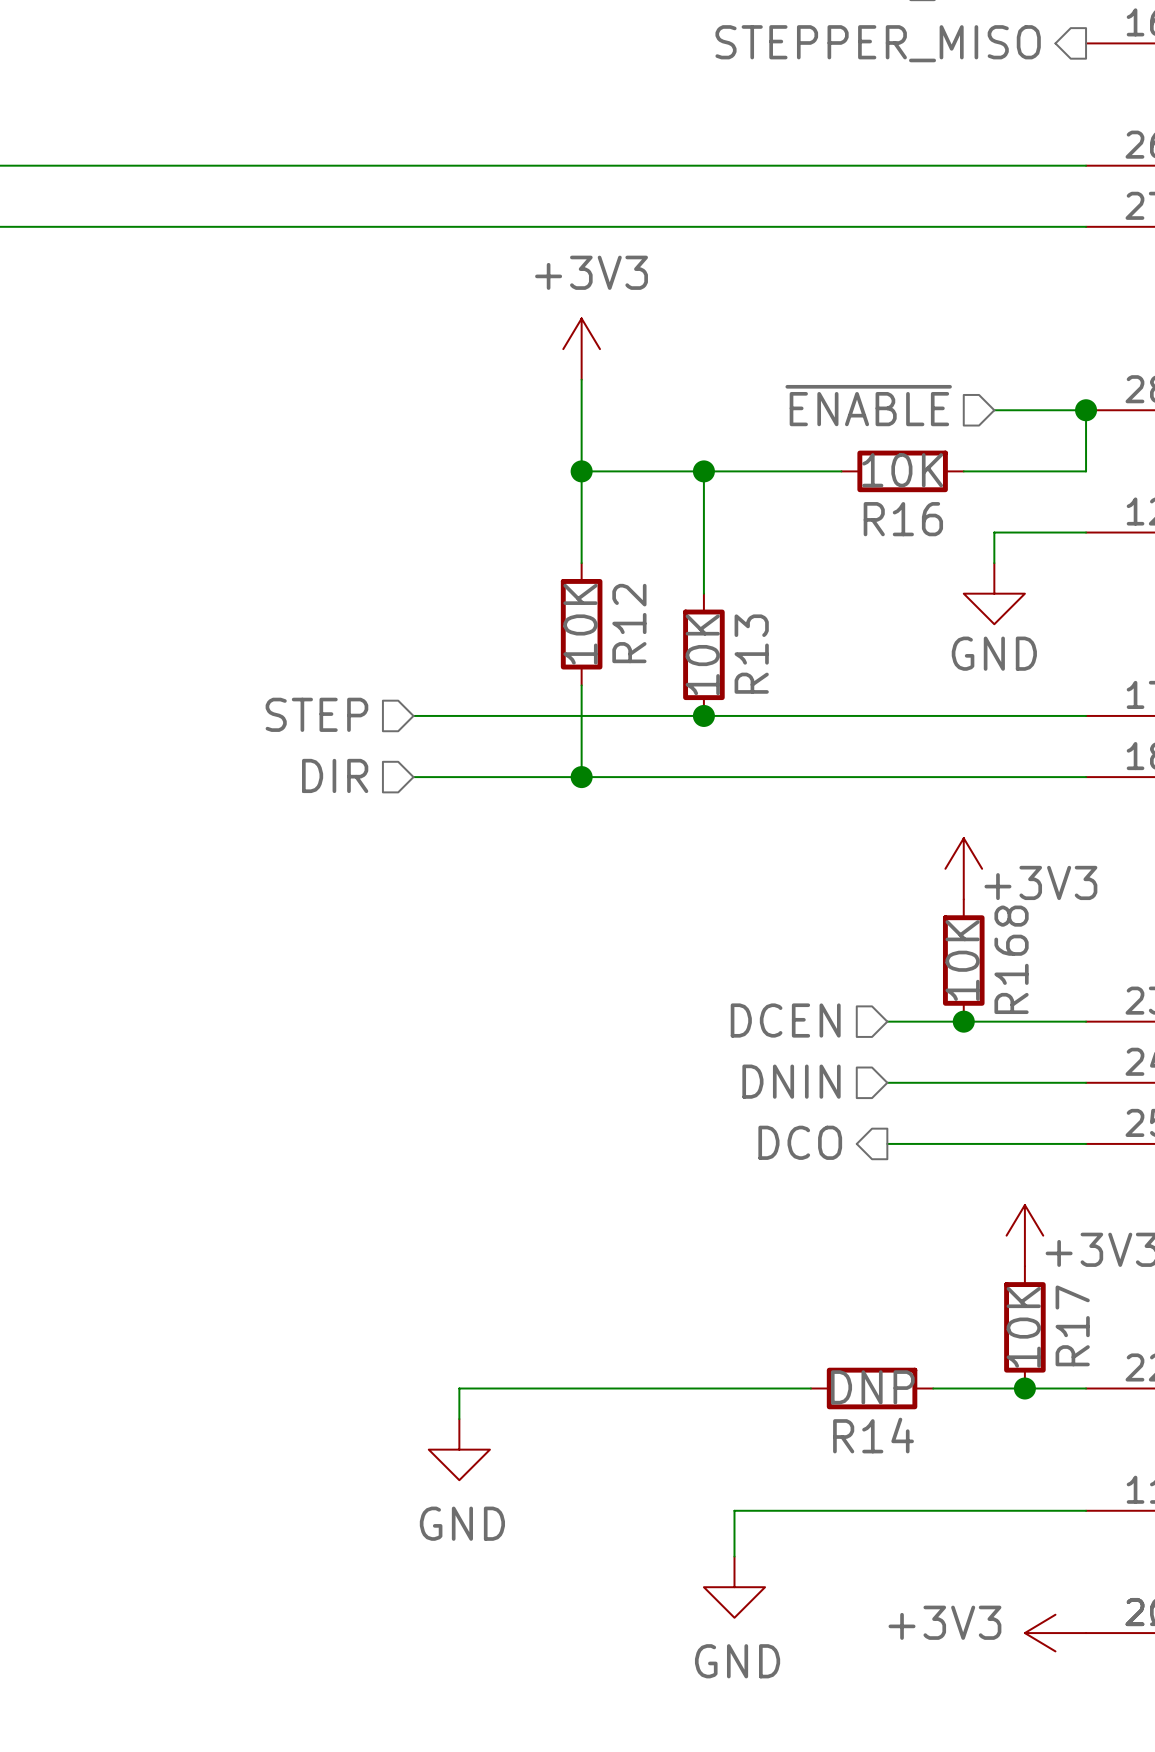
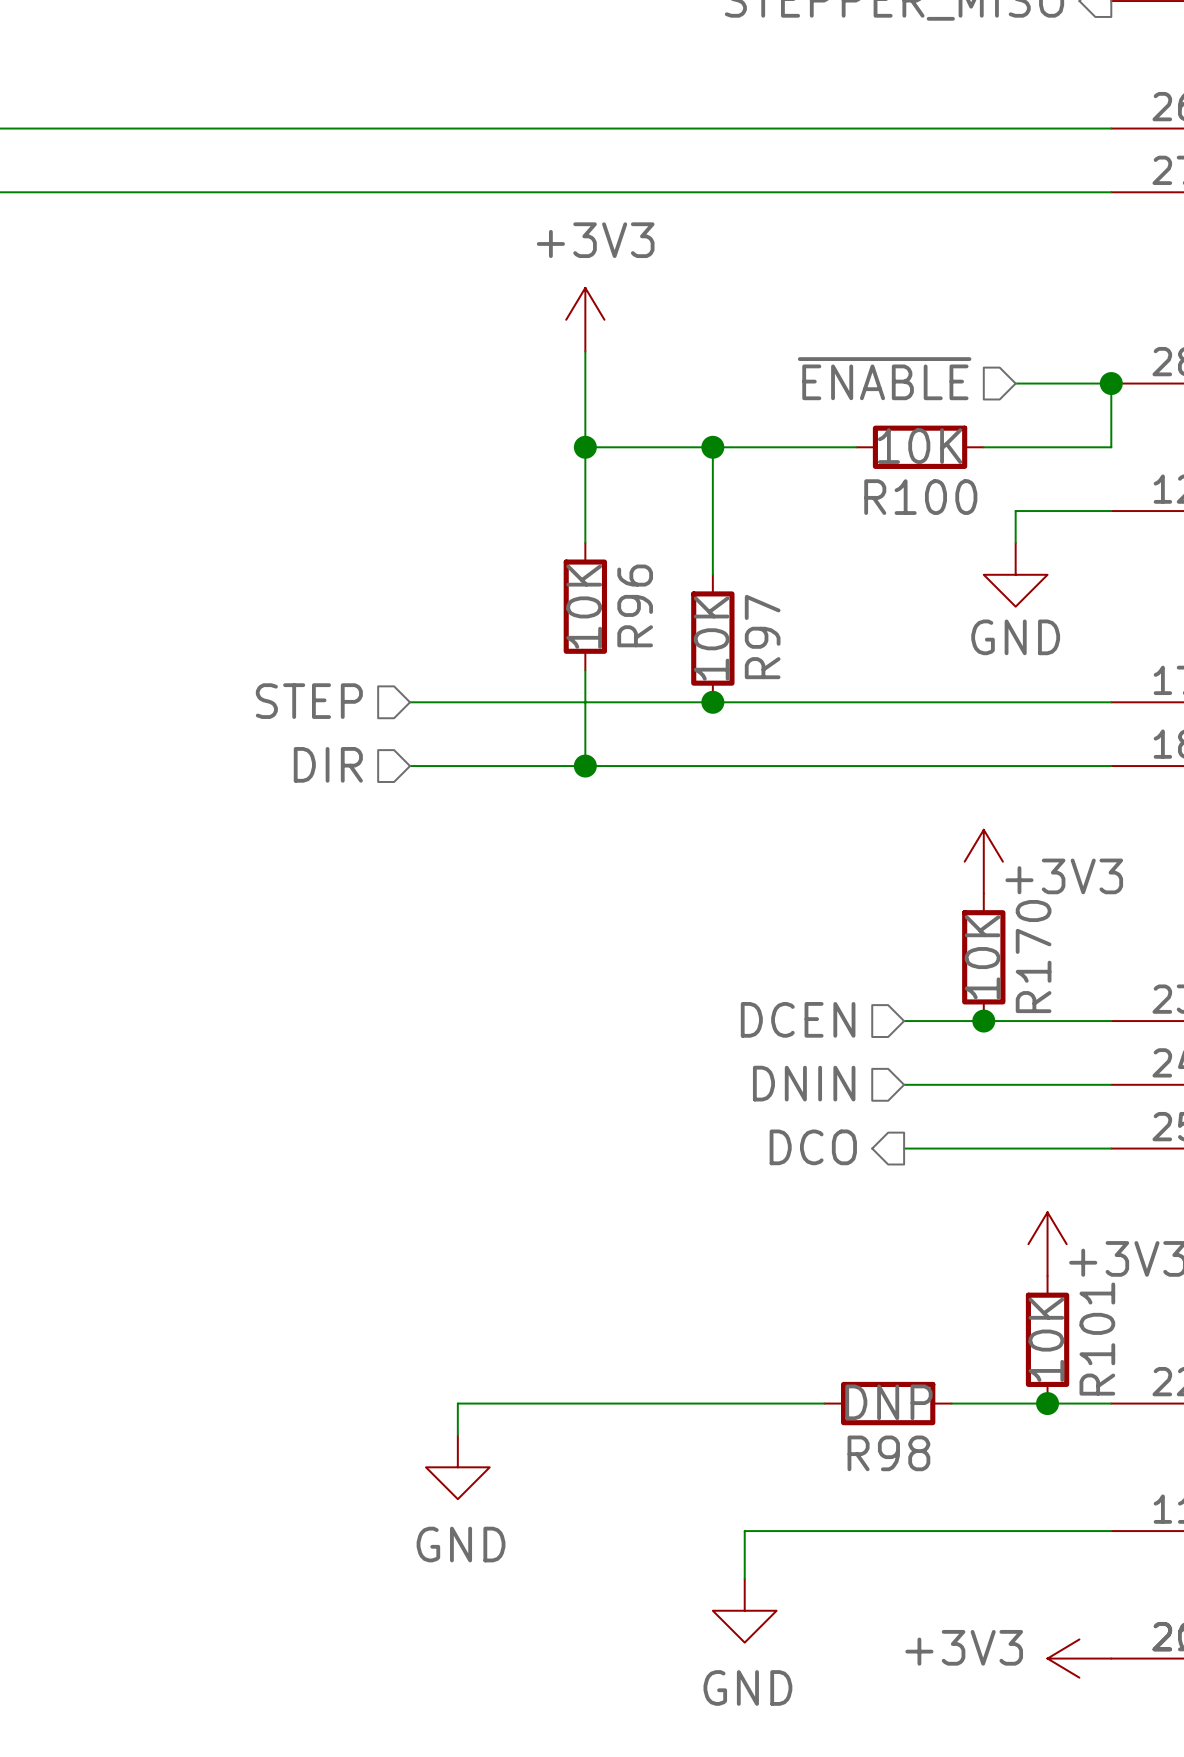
R16 name: R16 (903, 519) -> R100 (920, 497)
R12 name: R12 (629, 623) -> R96 (635, 605)
R13 name: R13 (751, 654) -> R97 (762, 637)
R168 name: R168 (1011, 959) -> R170 (1033, 956)
R17 name: R17 (1072, 1325) -> R101 (1097, 1339)
R14 name: R14 (873, 1435) -> R98 (888, 1453)

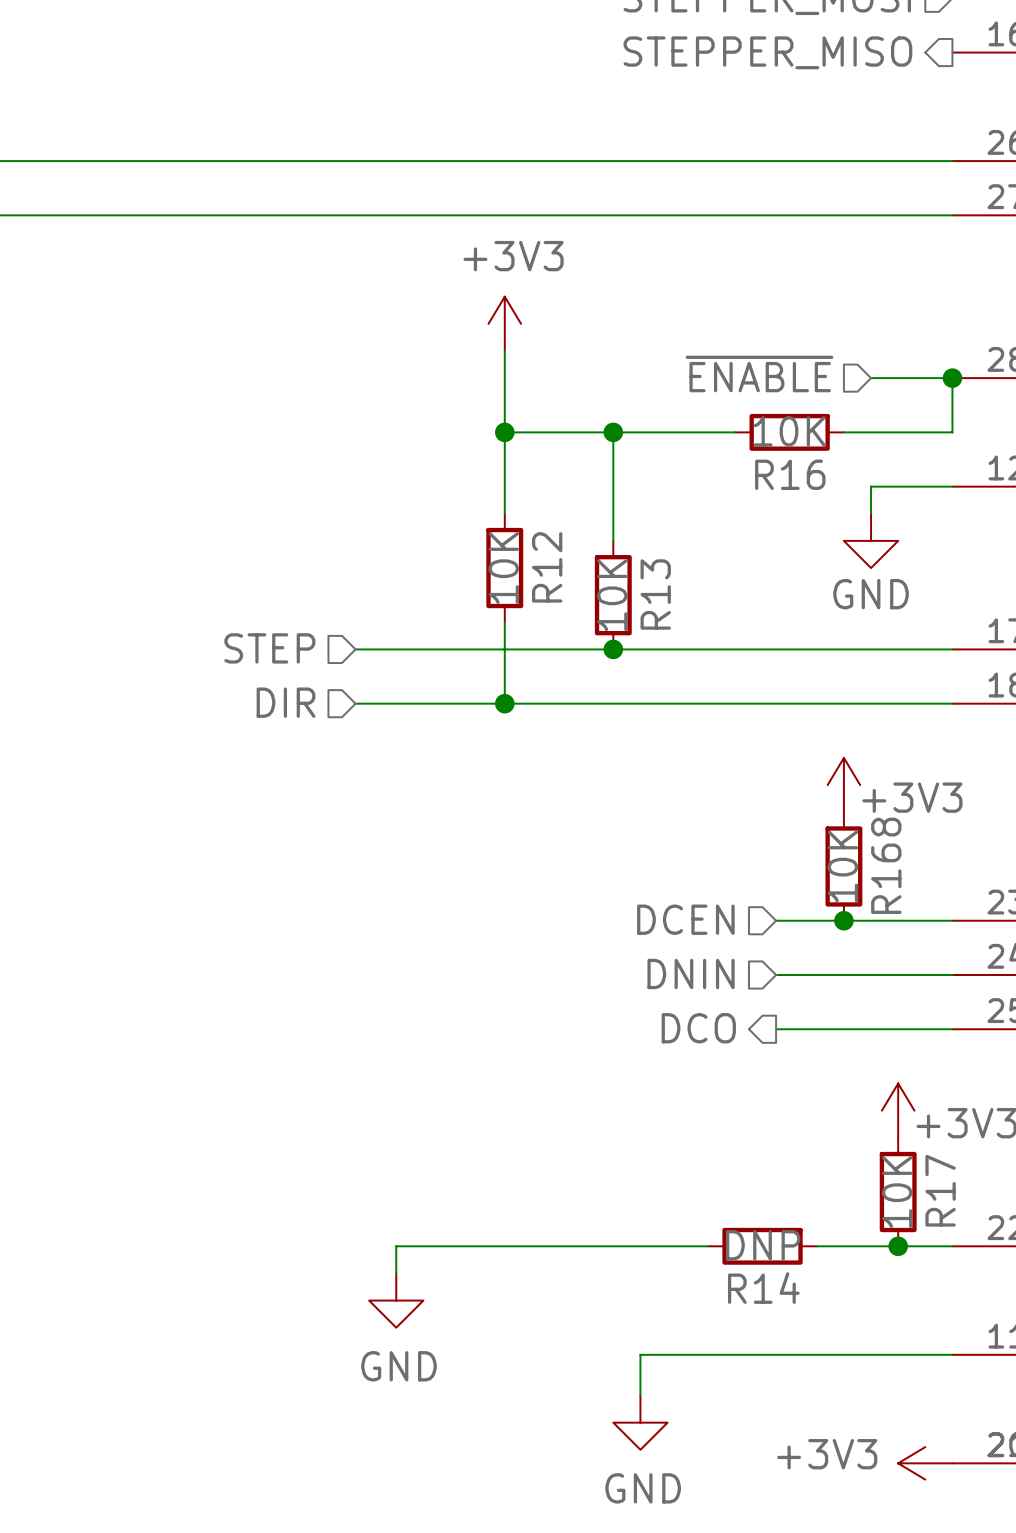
R100 name: R100 (920, 497) -> R16 (790, 474)
R96 name: R96 (635, 605) -> R12 (547, 567)
R97 name: R97 (762, 637) -> R13 (655, 594)
R170 name: R170 (1033, 956) -> R168 (886, 865)
R101 name: R101 (1097, 1339) -> R17 (940, 1190)
R98 name: R98 (888, 1453) -> R14 (763, 1288)

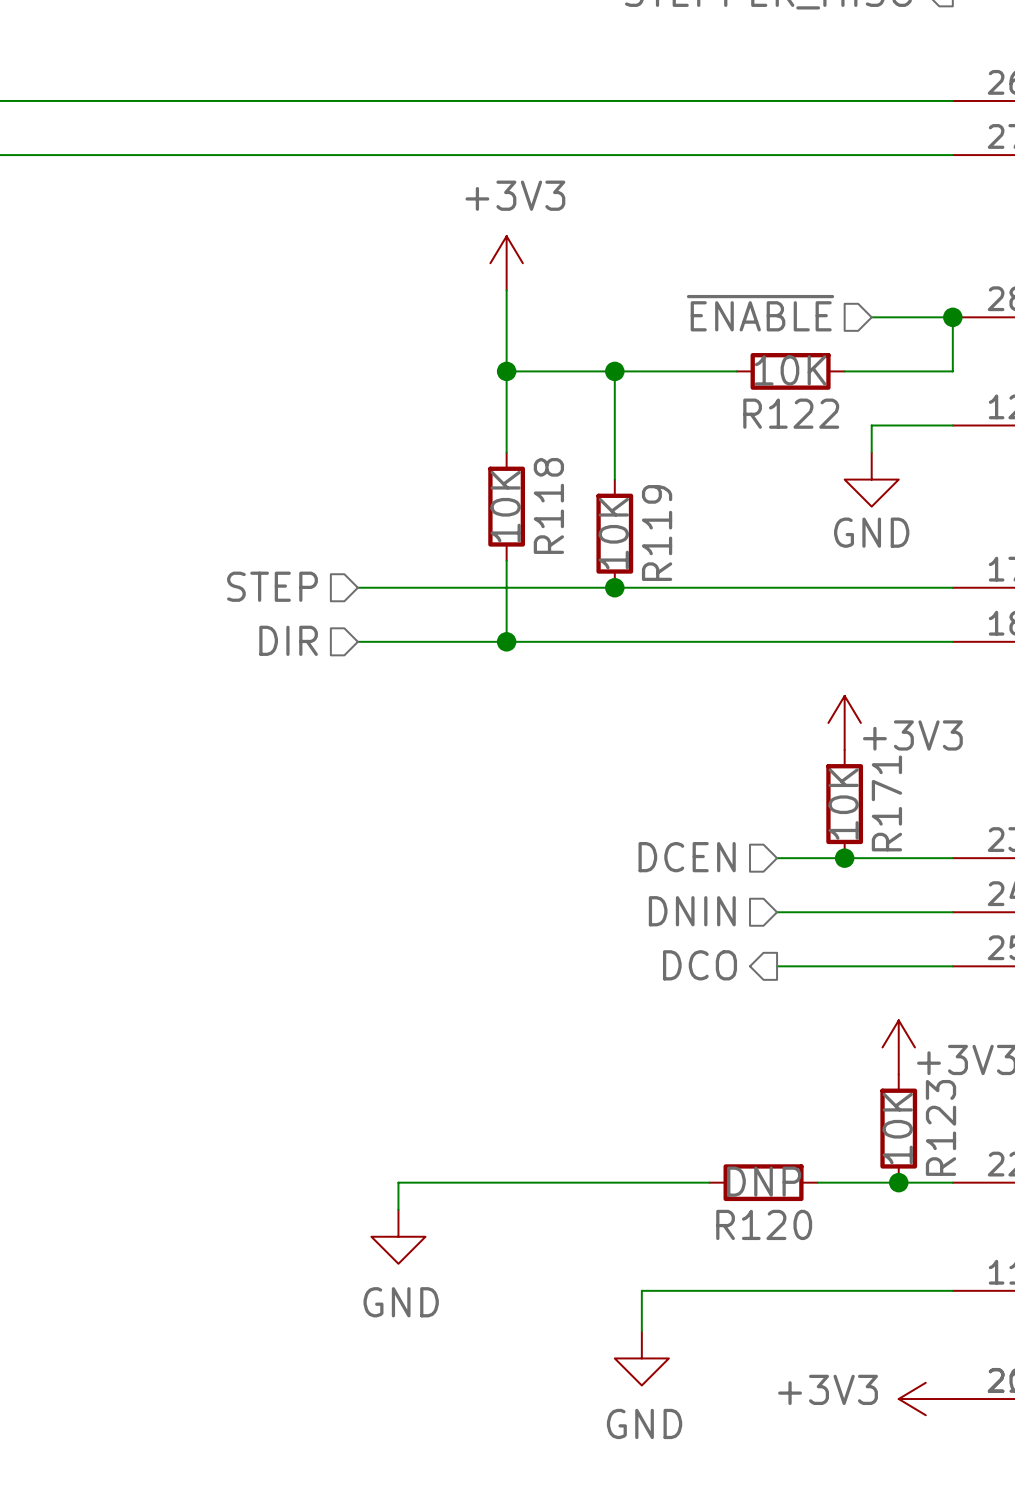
R16 name: R16 (790, 474) -> R122 (791, 413)
R12 name: R12 (547, 567) -> R118 (548, 505)
R13 name: R13 (655, 594) -> R119 (657, 533)
R168 name: R168 (886, 865) -> R171 (886, 803)
R17 name: R17 (940, 1190) -> R123 (941, 1127)
R14 name: R14 (763, 1288) -> R120 (764, 1224)

